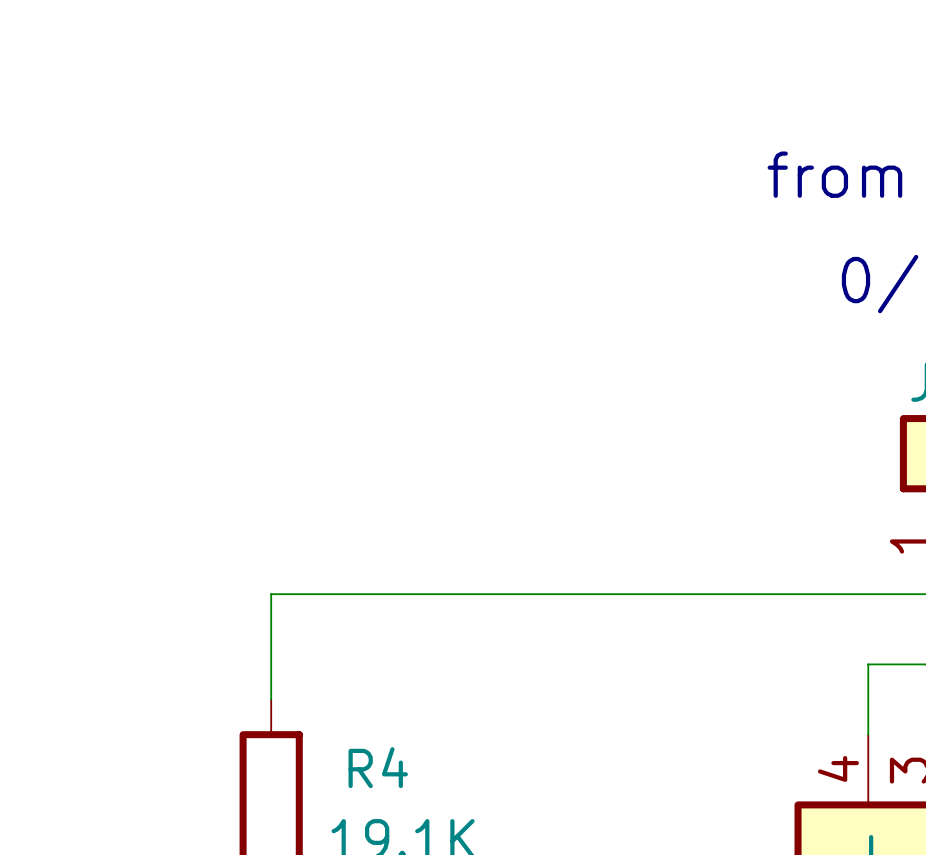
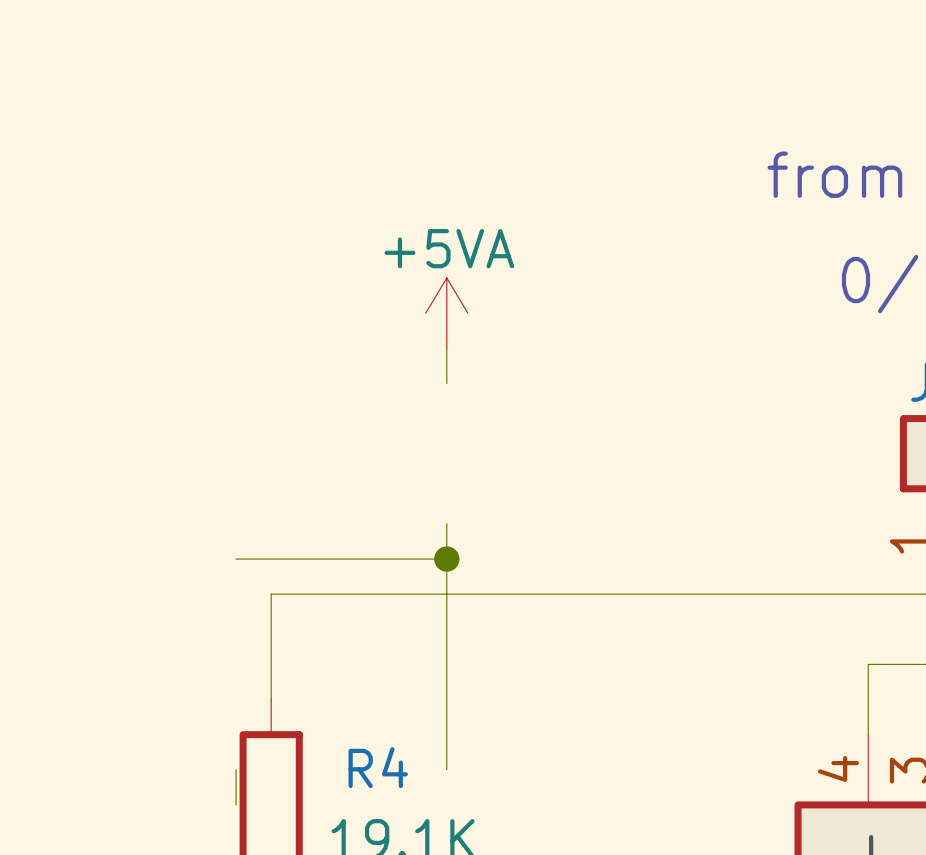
power symbol: none -> +5VA (446, 313)
wire: none -> (446, 348) (446, 383)
wire: none -> (446, 523) (446, 769)
wire: none -> (236, 559) (446, 559)
junction: none -> (446, 559)
wire: none -> (236, 769) (236, 804)

